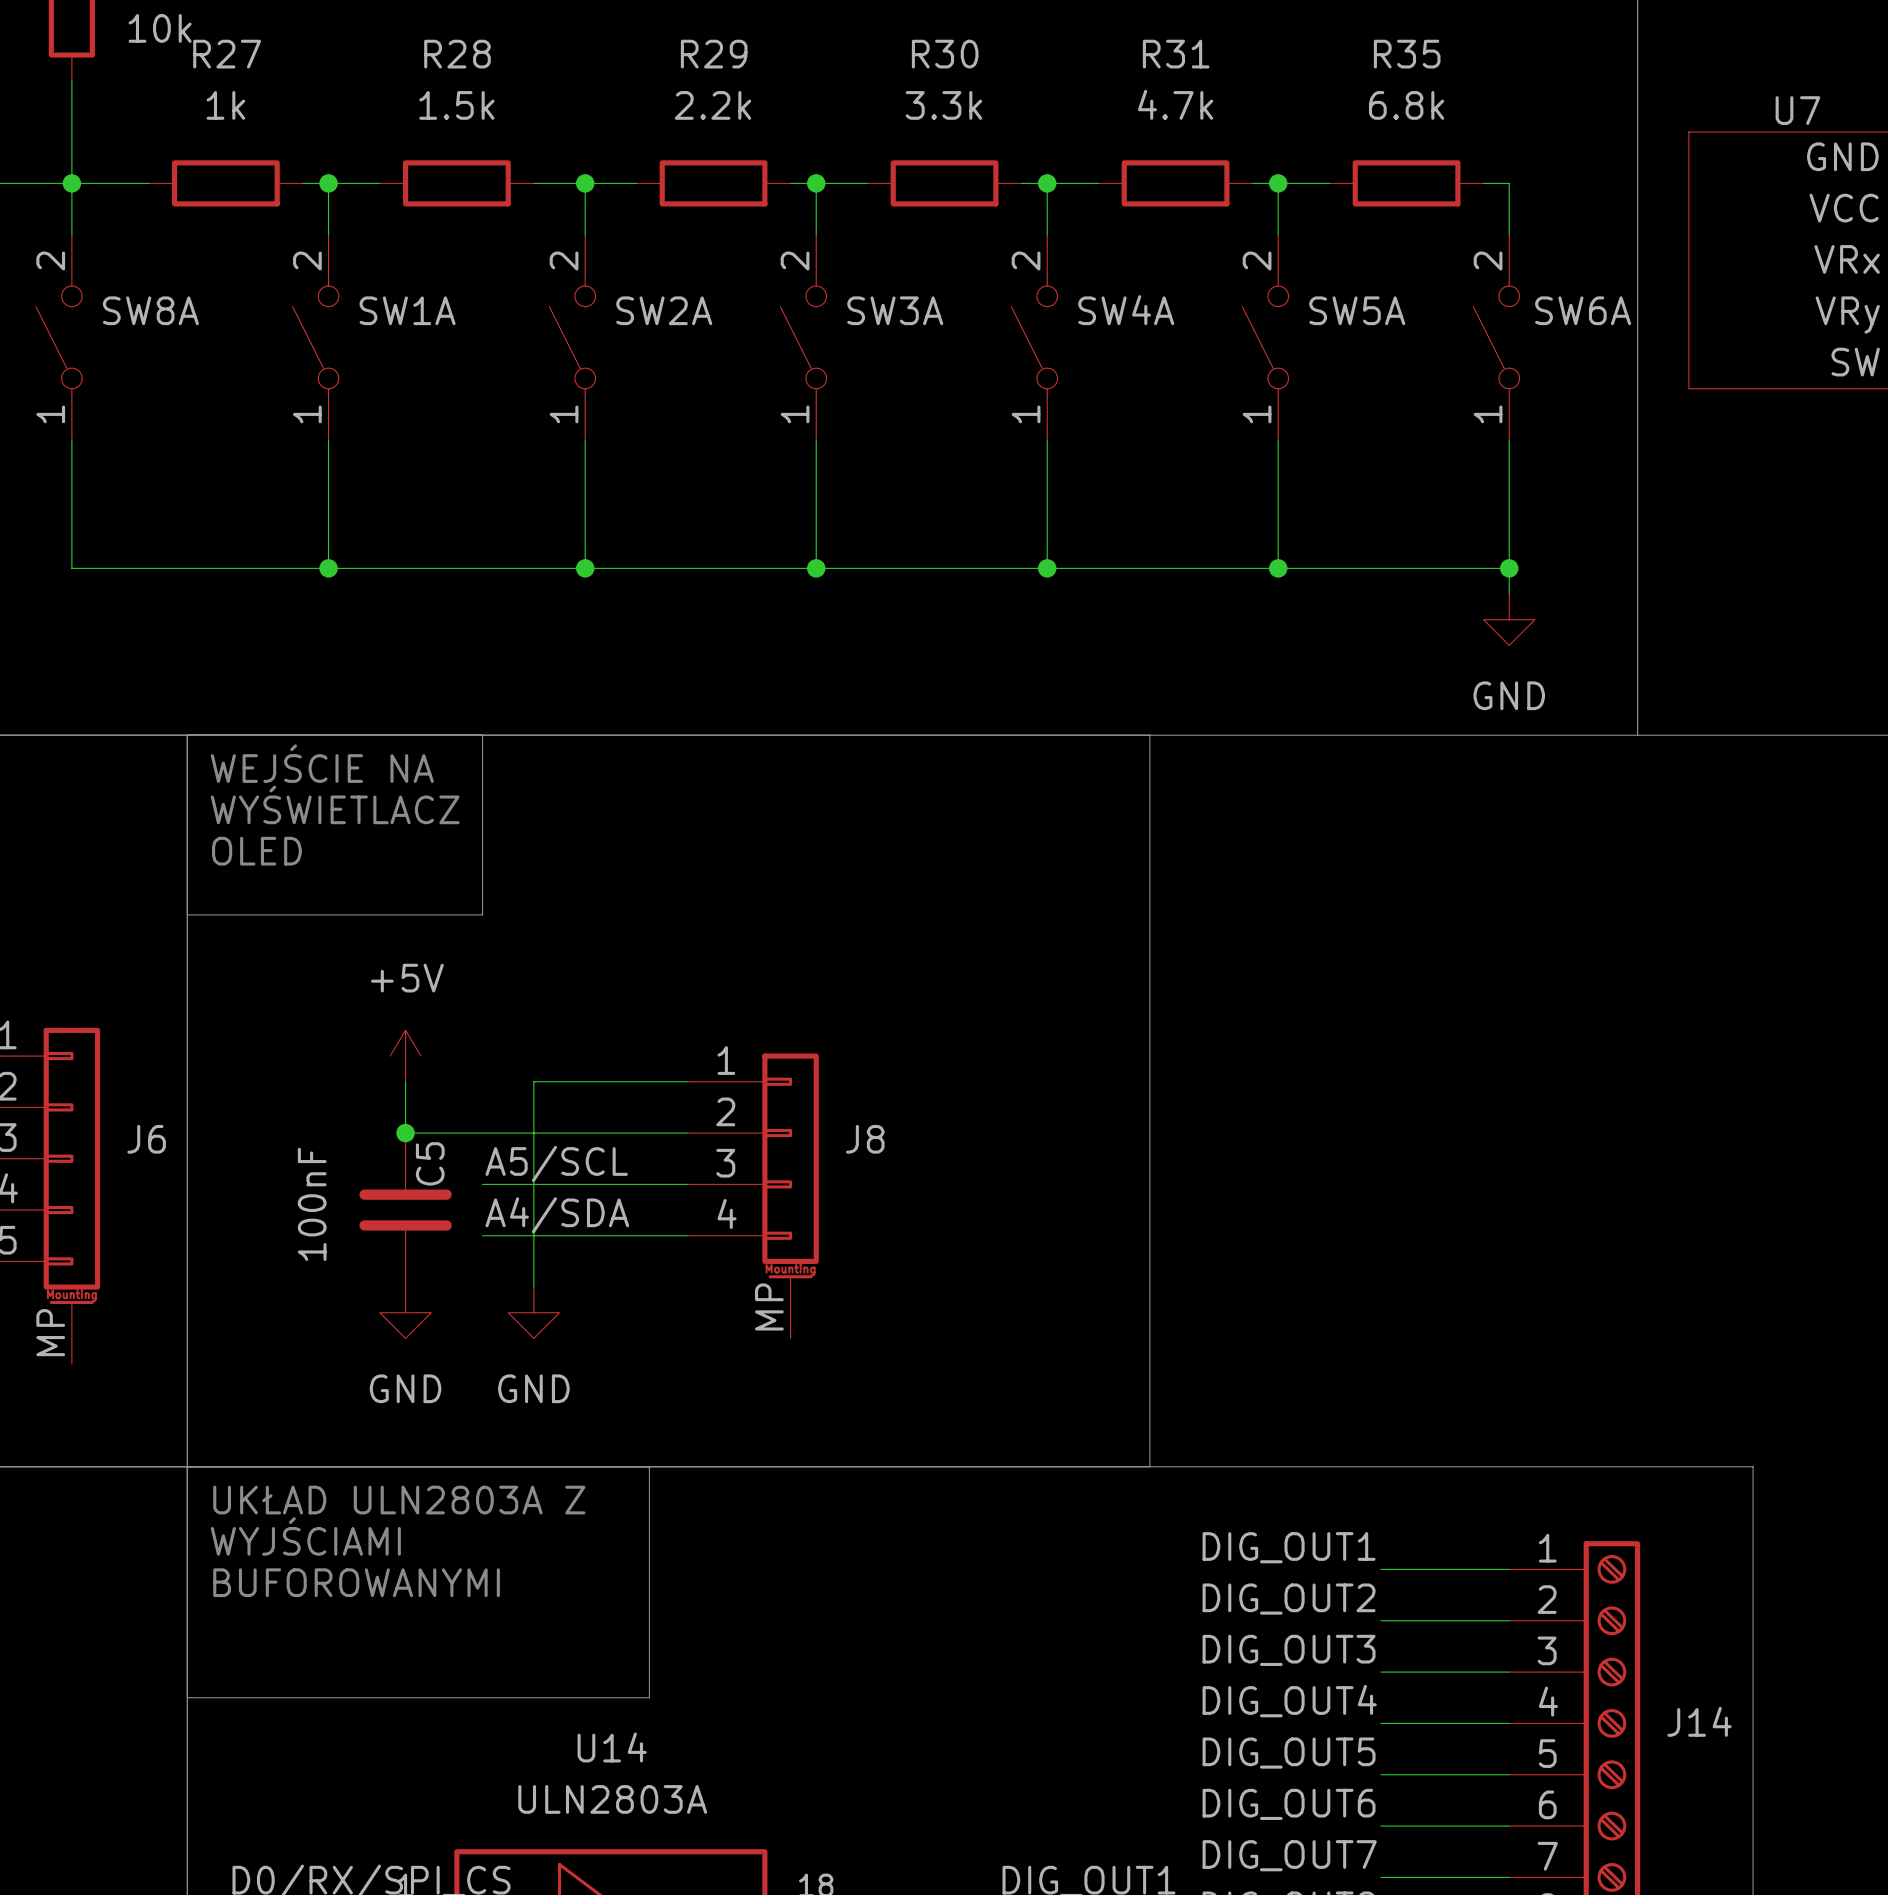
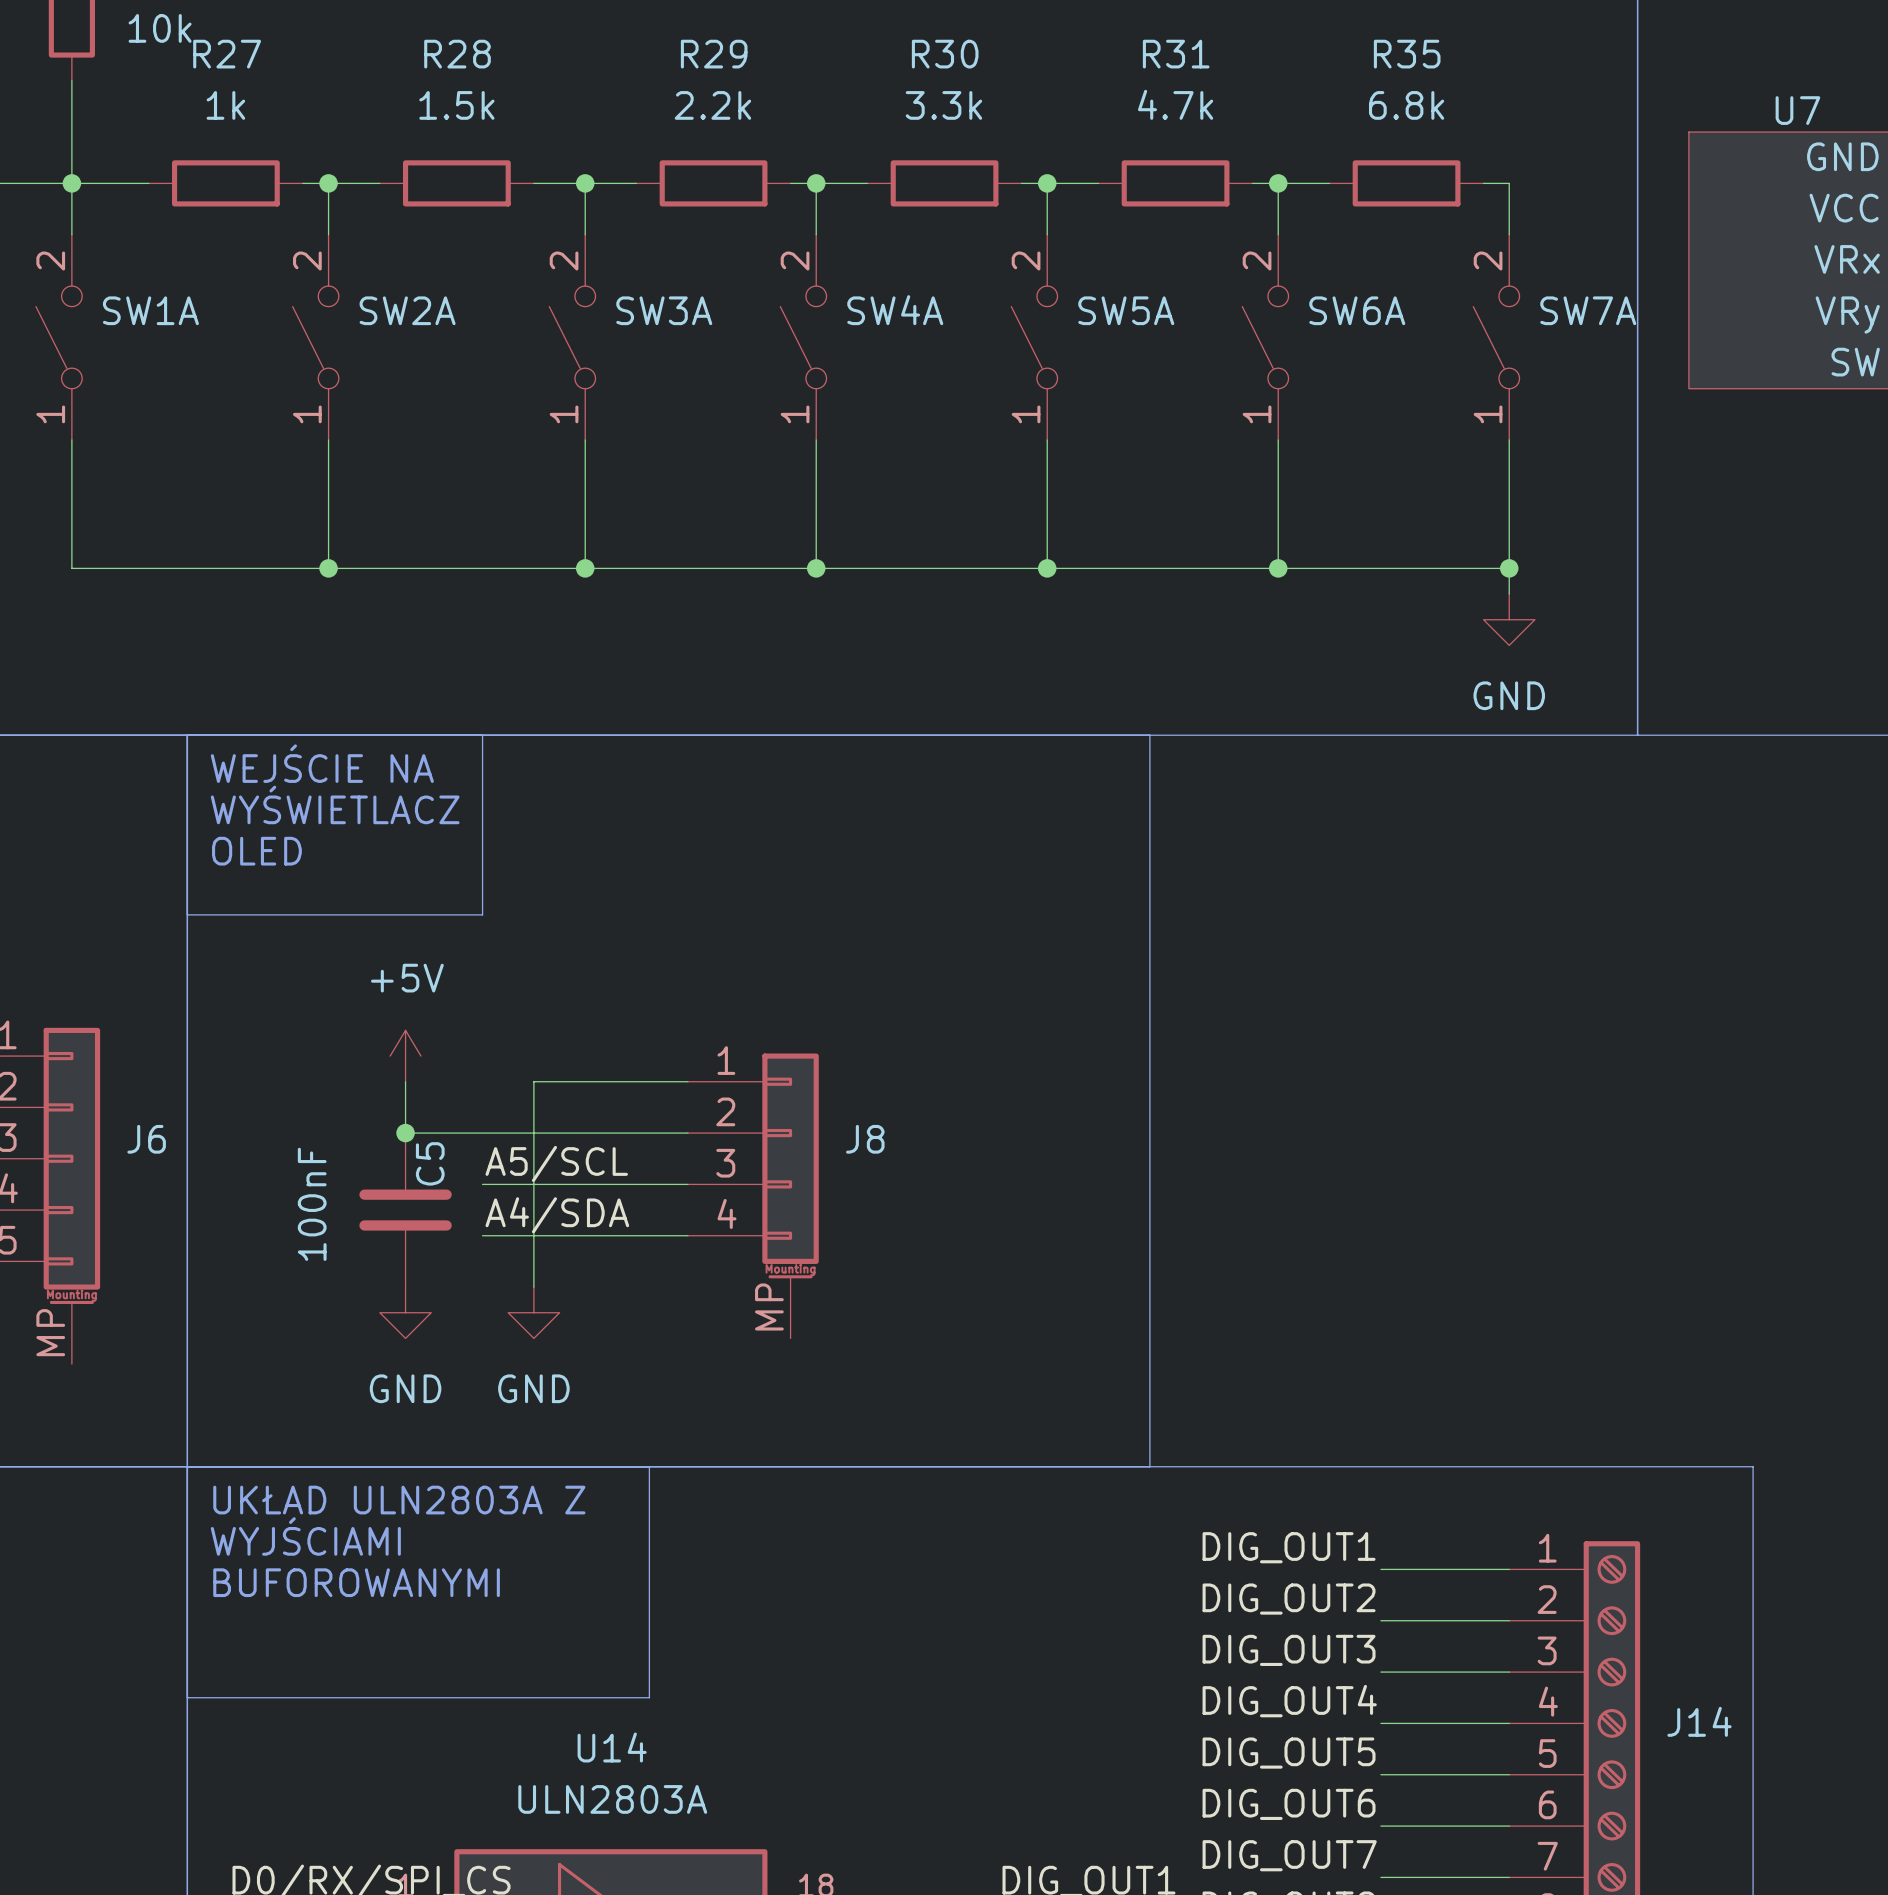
SW8A name: SW8A (150, 310) -> SW1A (150, 310)
SW1A name: SW1A (407, 310) -> SW2A (407, 310)
SW2A name: SW2A (664, 310) -> SW3A (664, 310)
SW3A name: SW3A (895, 310) -> SW4A (895, 310)
SW4A name: SW4A (1126, 310) -> SW5A (1126, 310)
SW5A name: SW5A (1357, 310) -> SW6A (1357, 310)
SW6A name: SW6A (1583, 310) -> SW7A (1588, 310)

